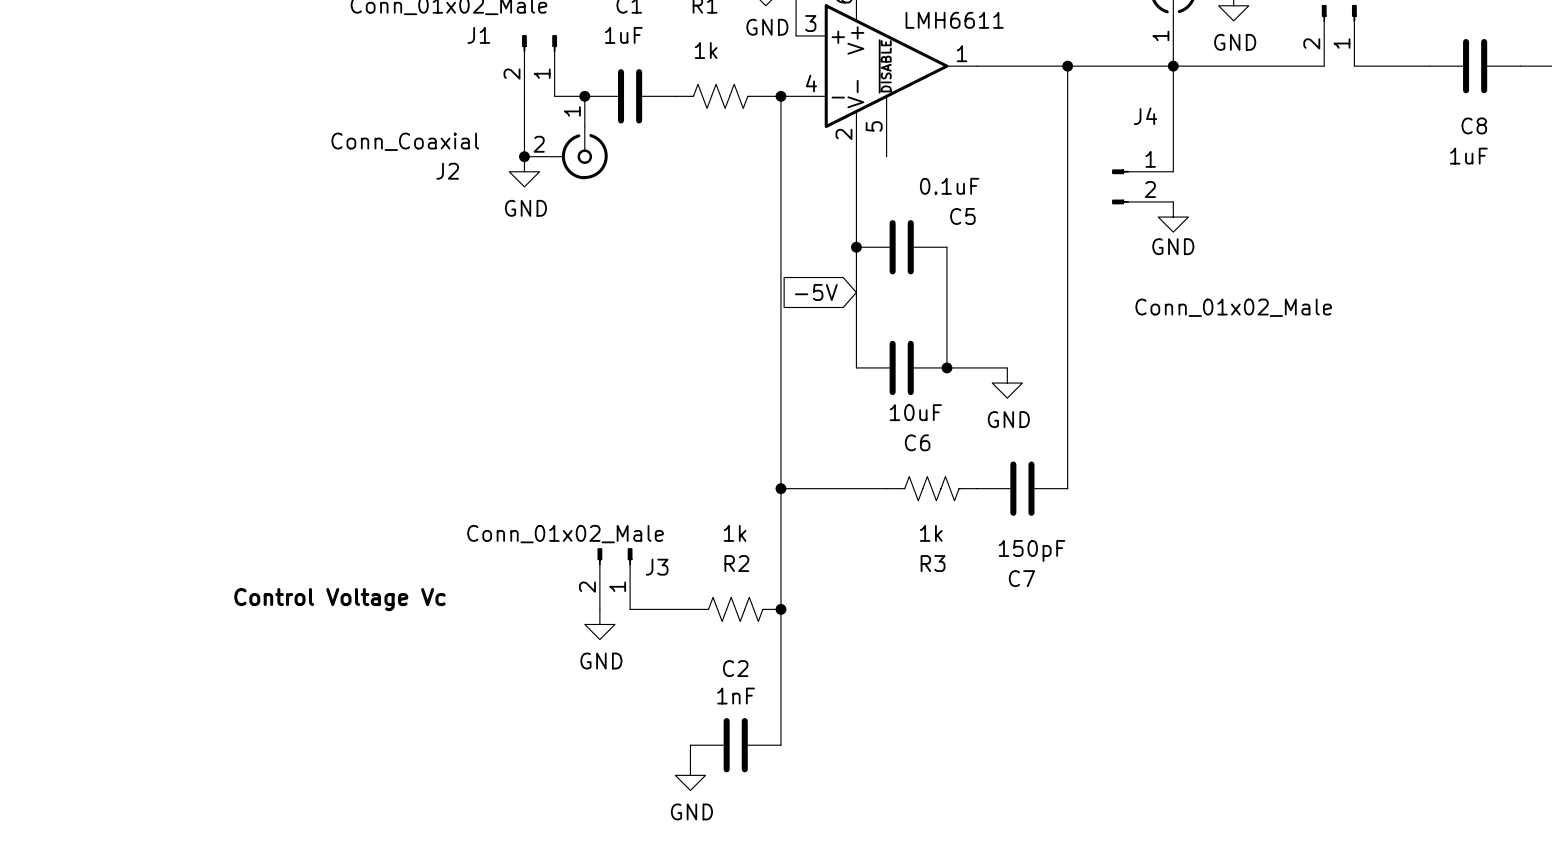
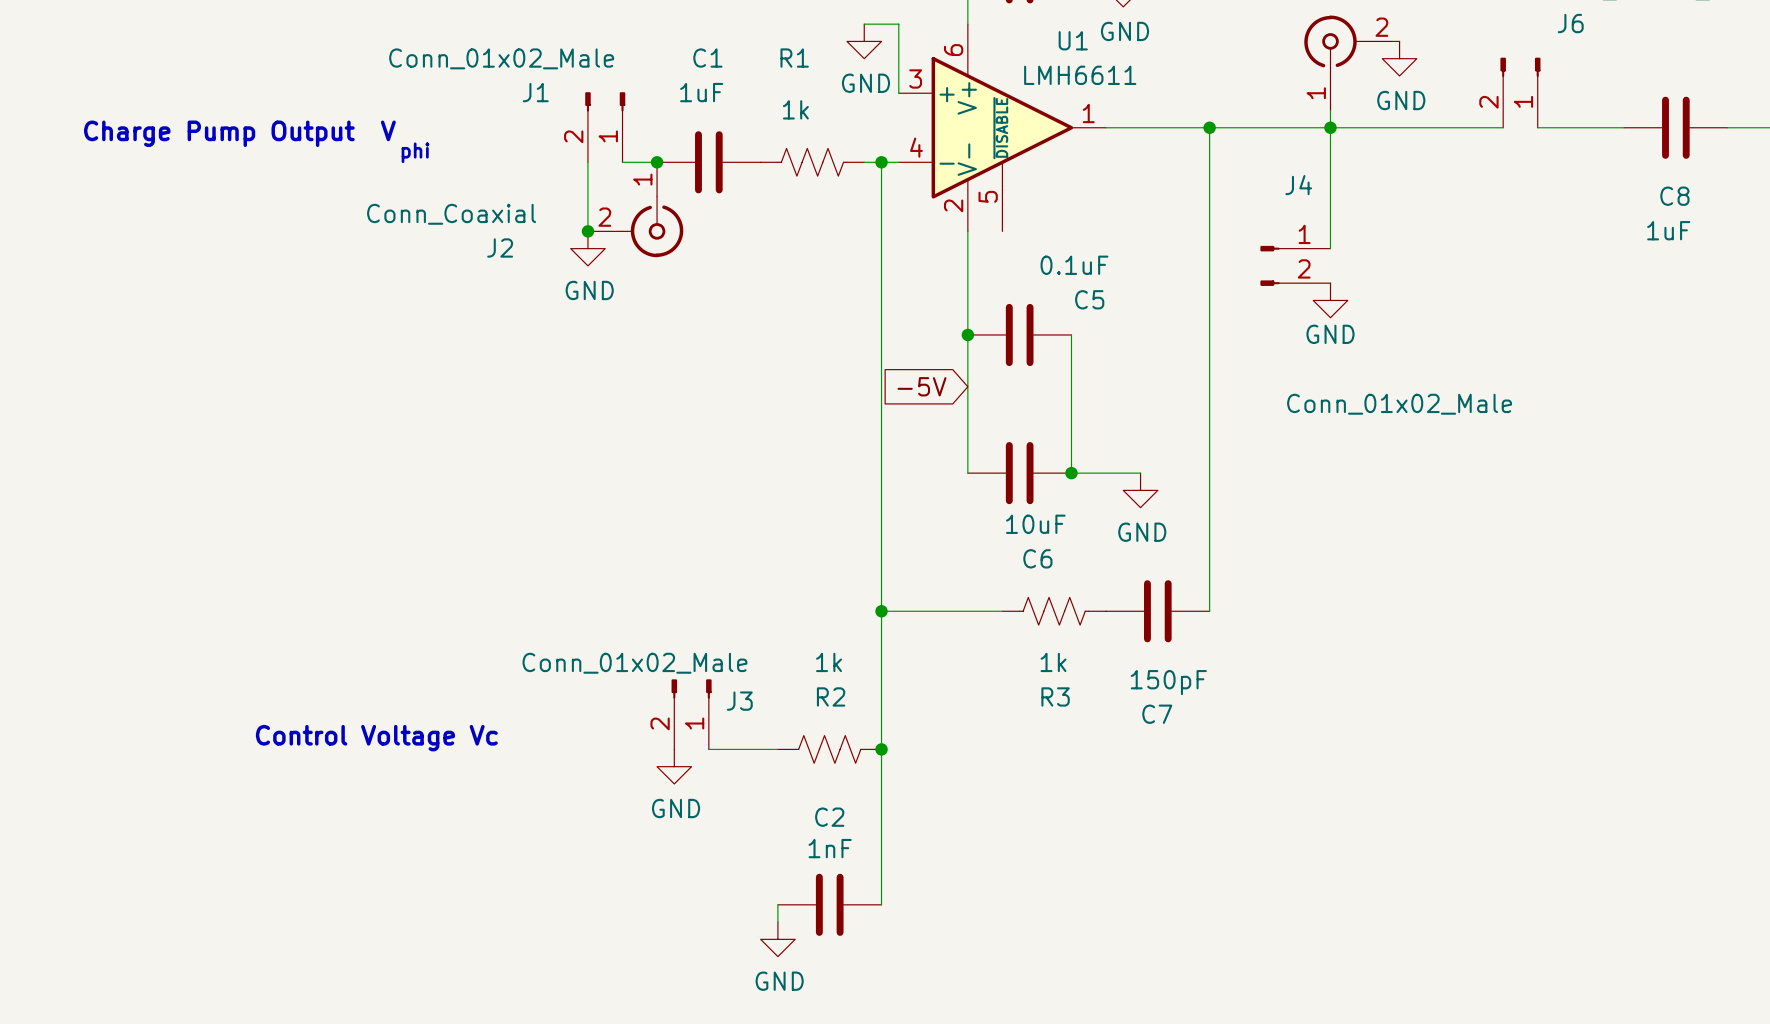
text: none -> Charge Pump Output V (239, 133)
text: none -> phi (415, 152)

